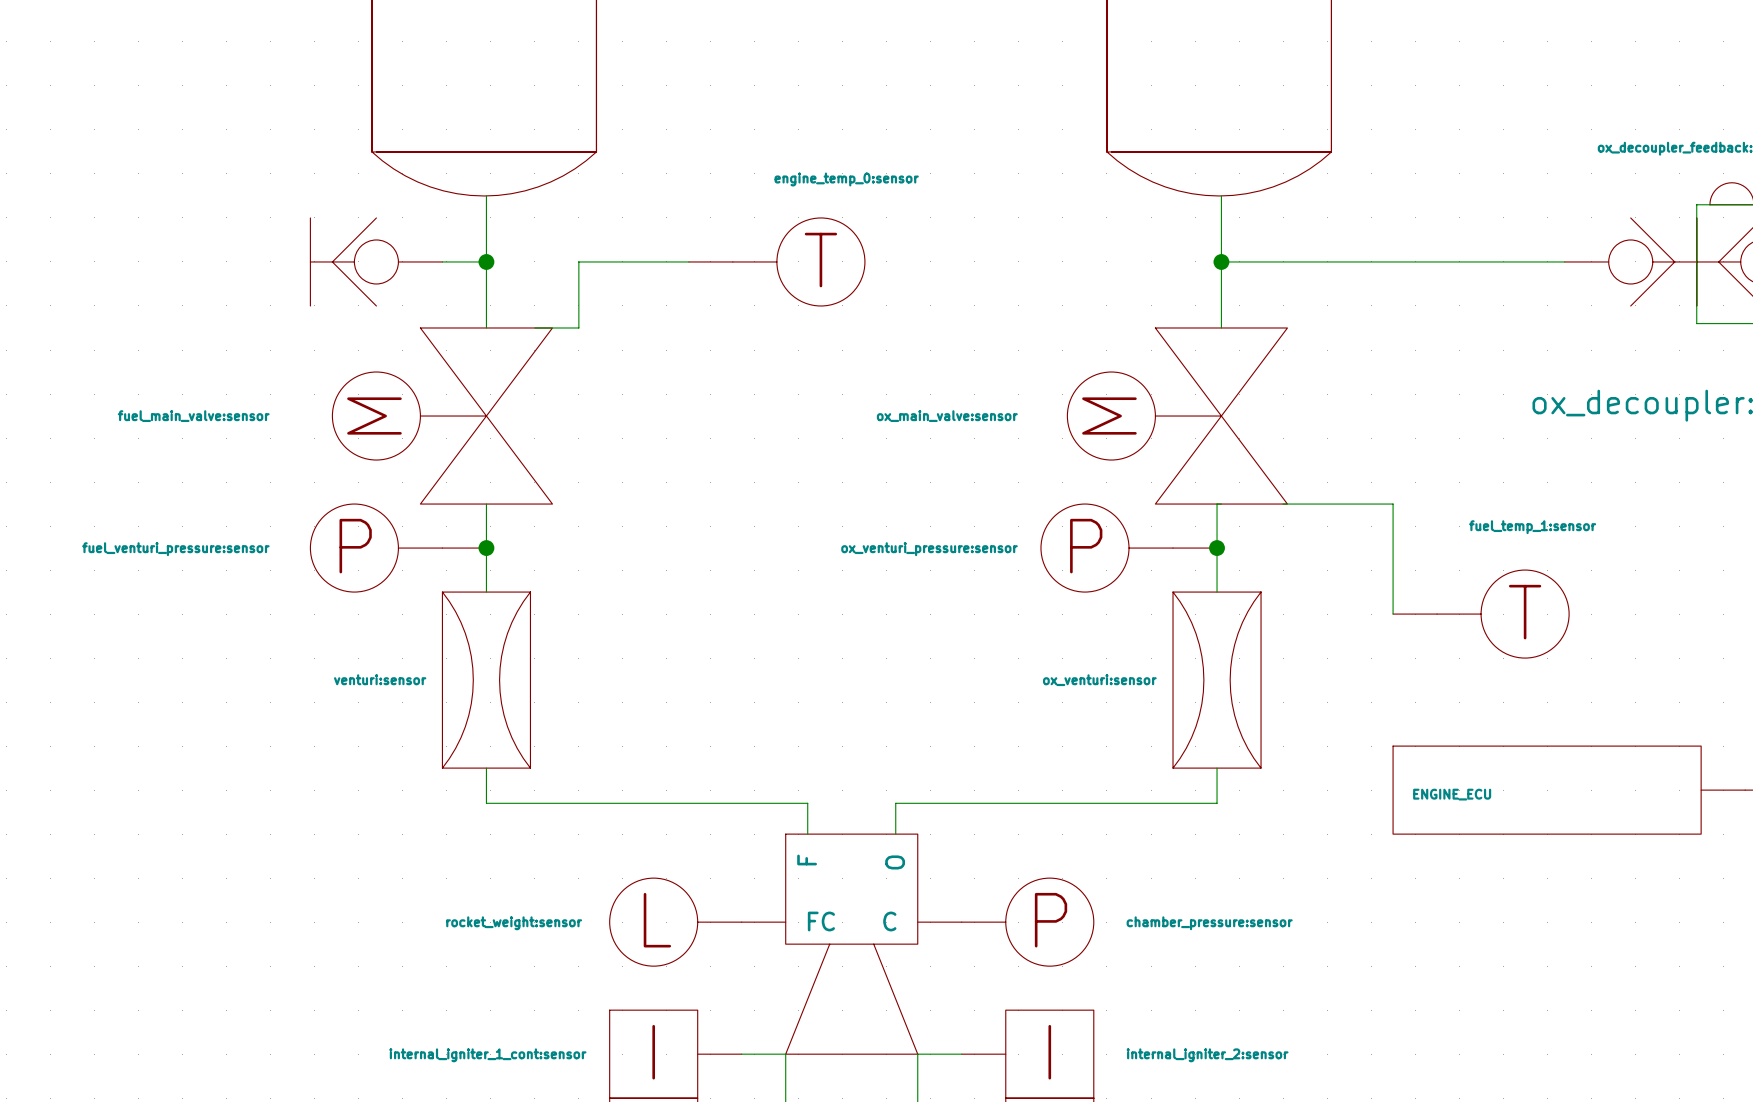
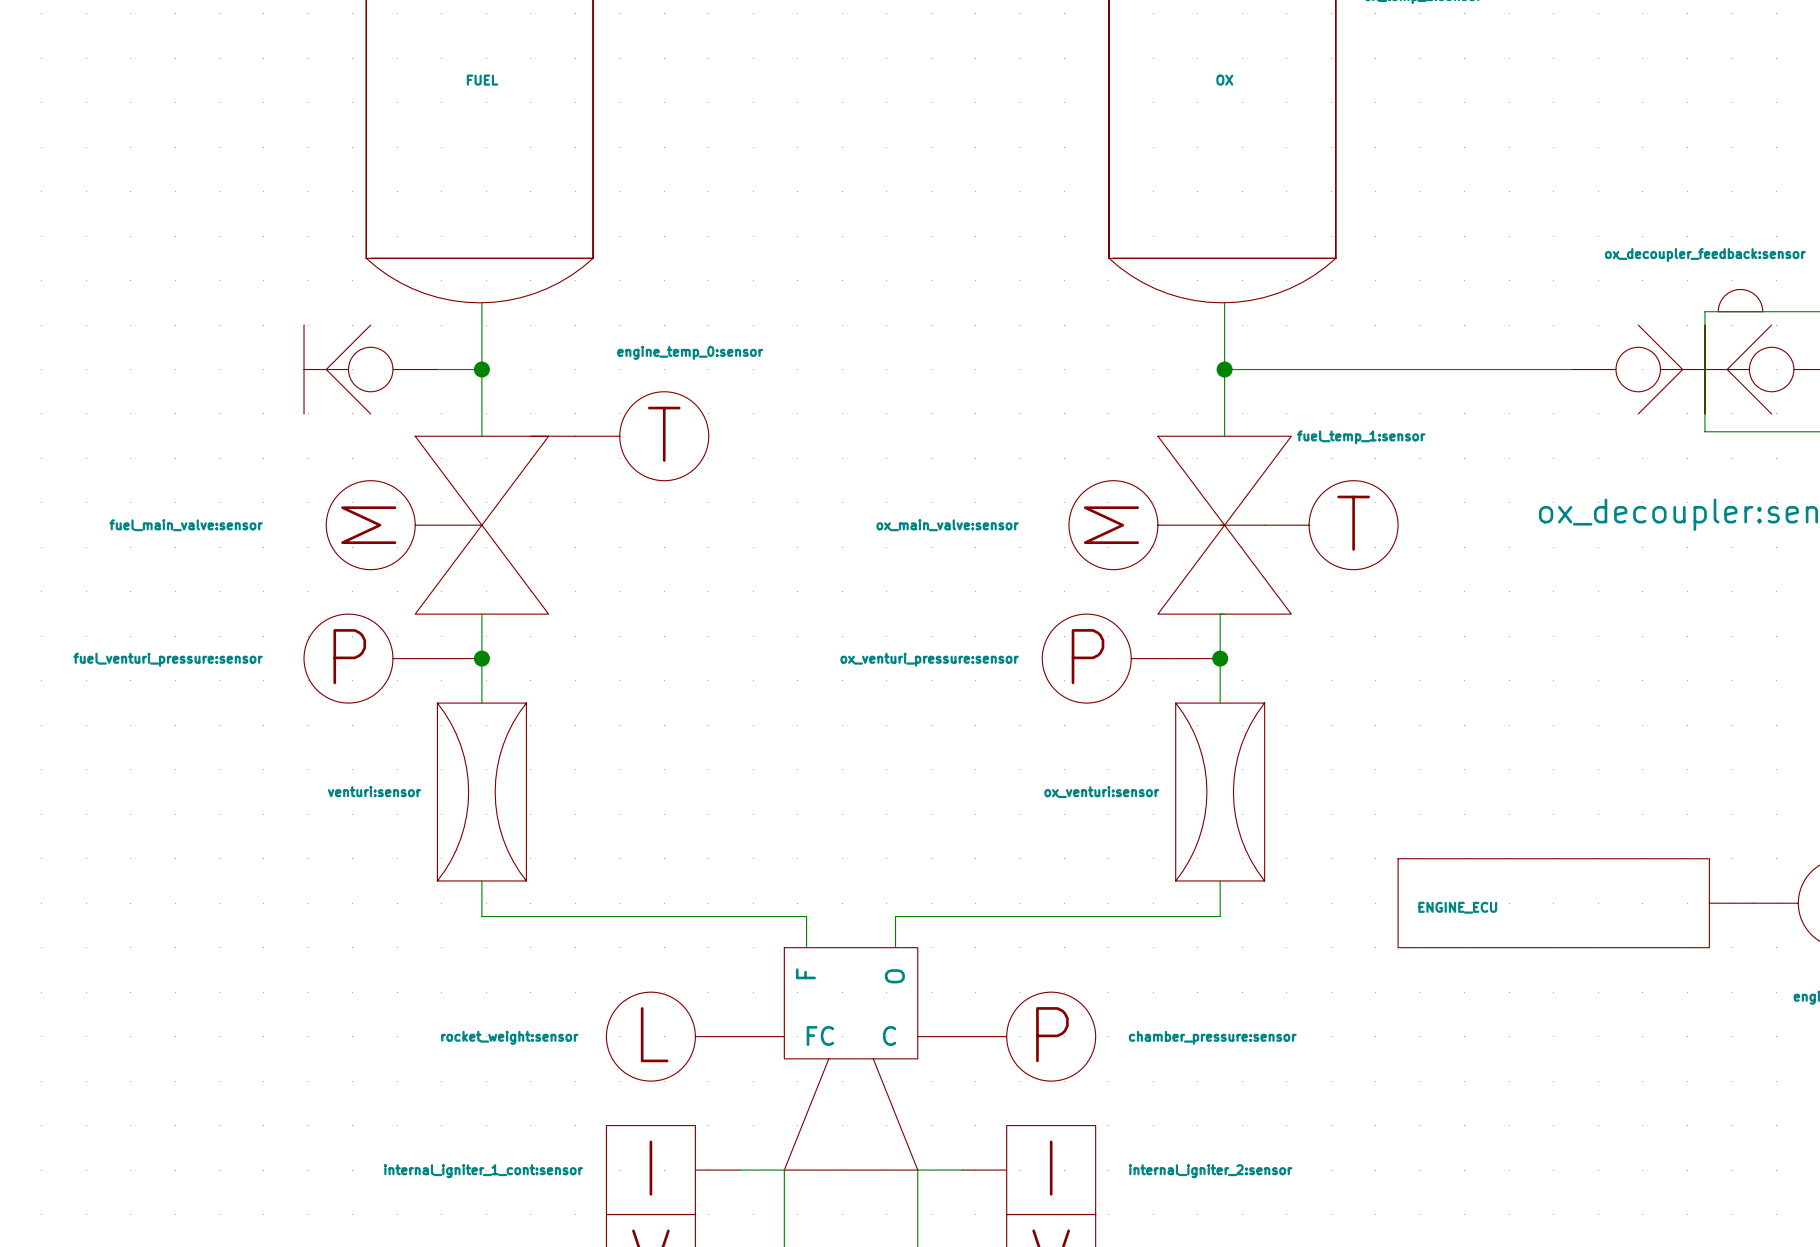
wire: (688, 261) (578, 261) (578, 327) (534, 327) -> none
part position: (776, 261) -> (619, 436)
wire: (1283, 504) (1393, 504) (1393, 614) -> none
part position: (1481, 614) -> (1309, 525)

